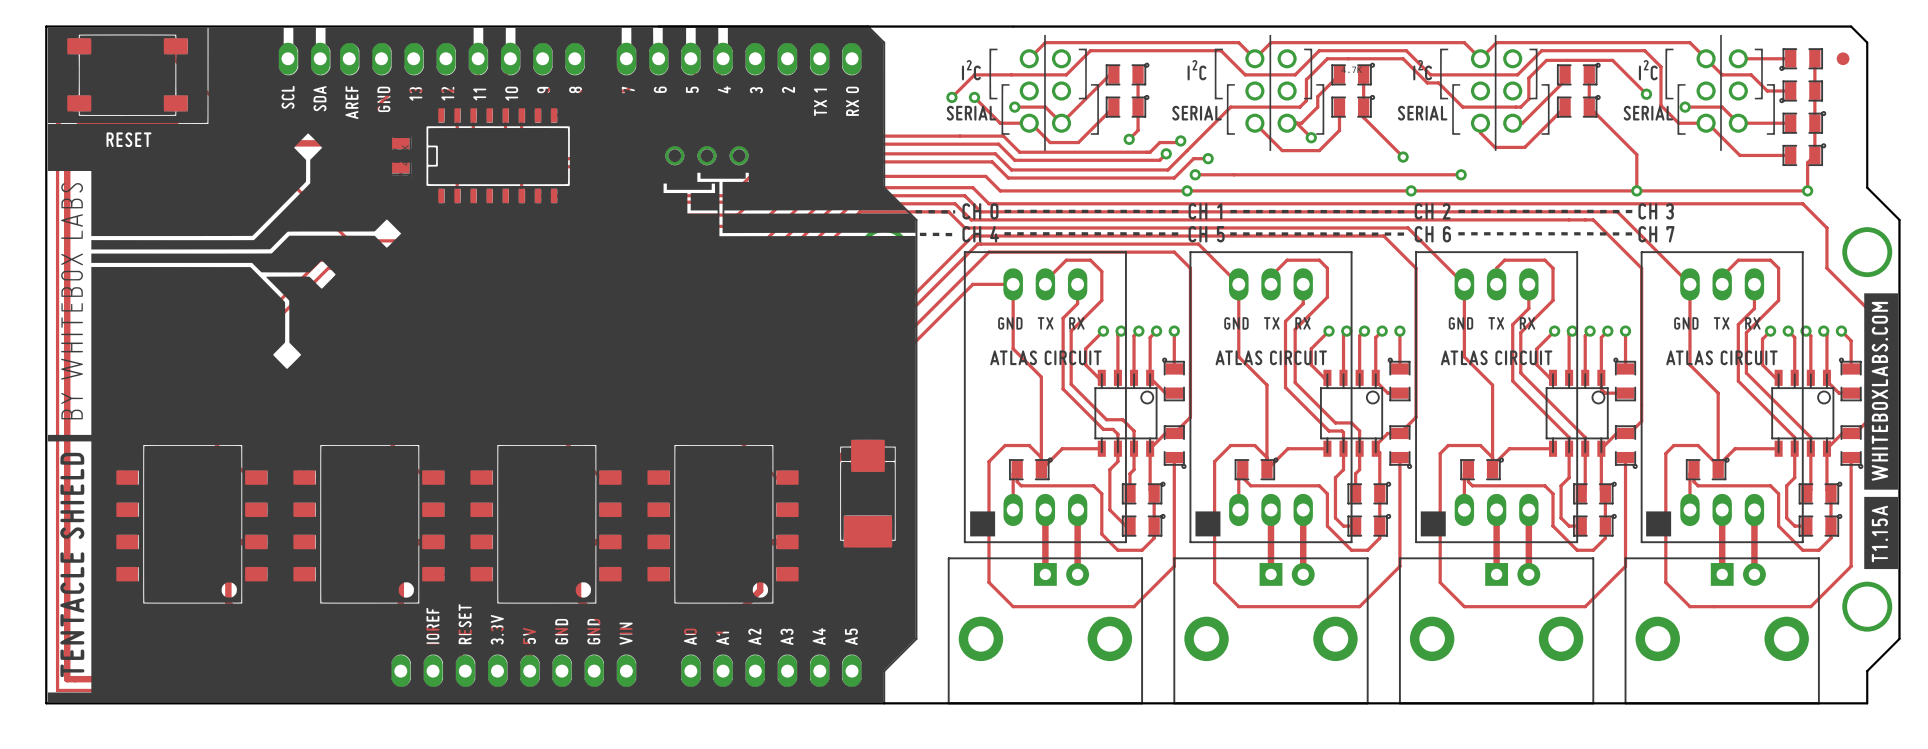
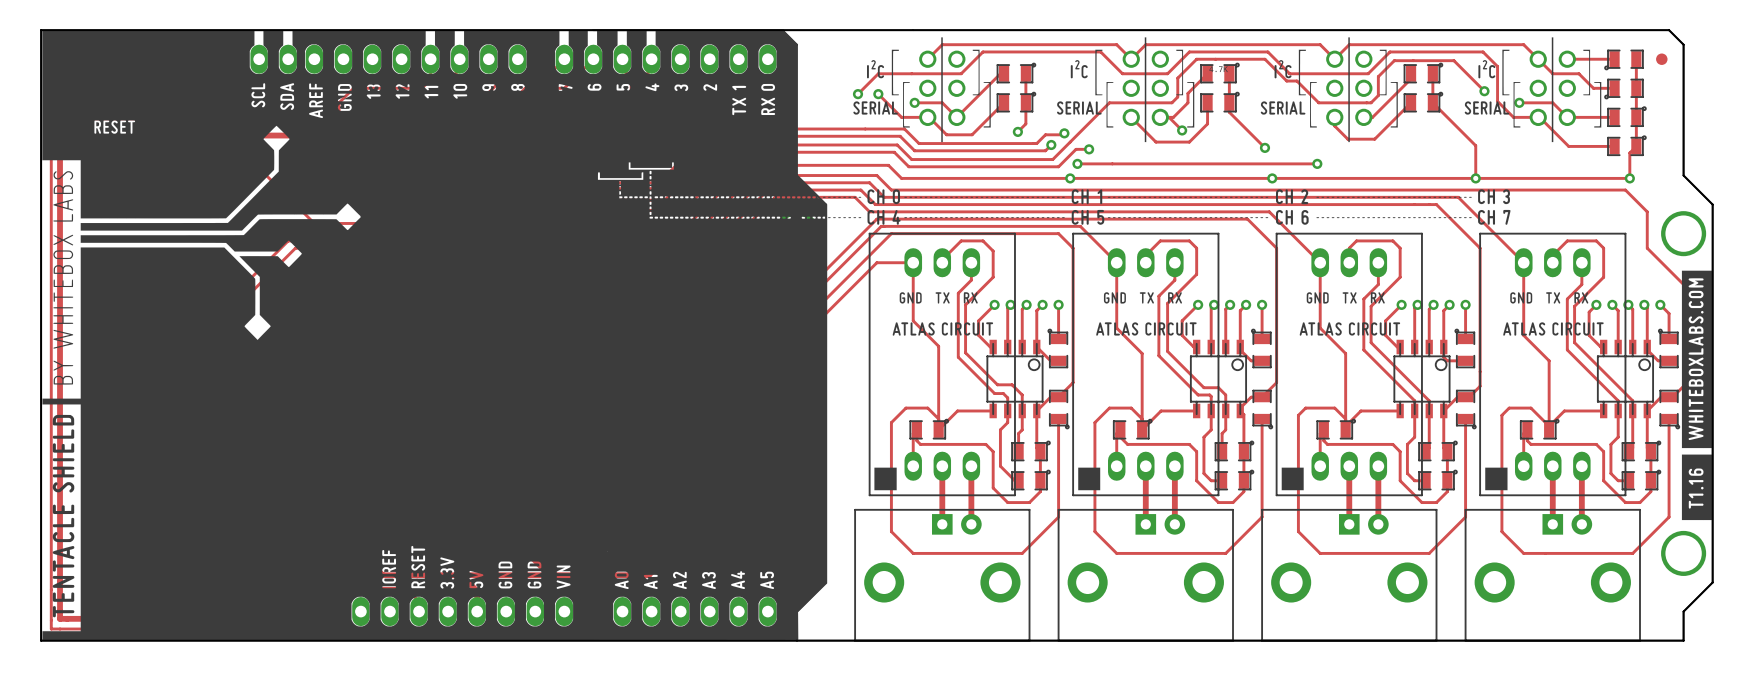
drawing shape: [47, 27, 1899, 703] -> [42, 30, 1713, 640]

